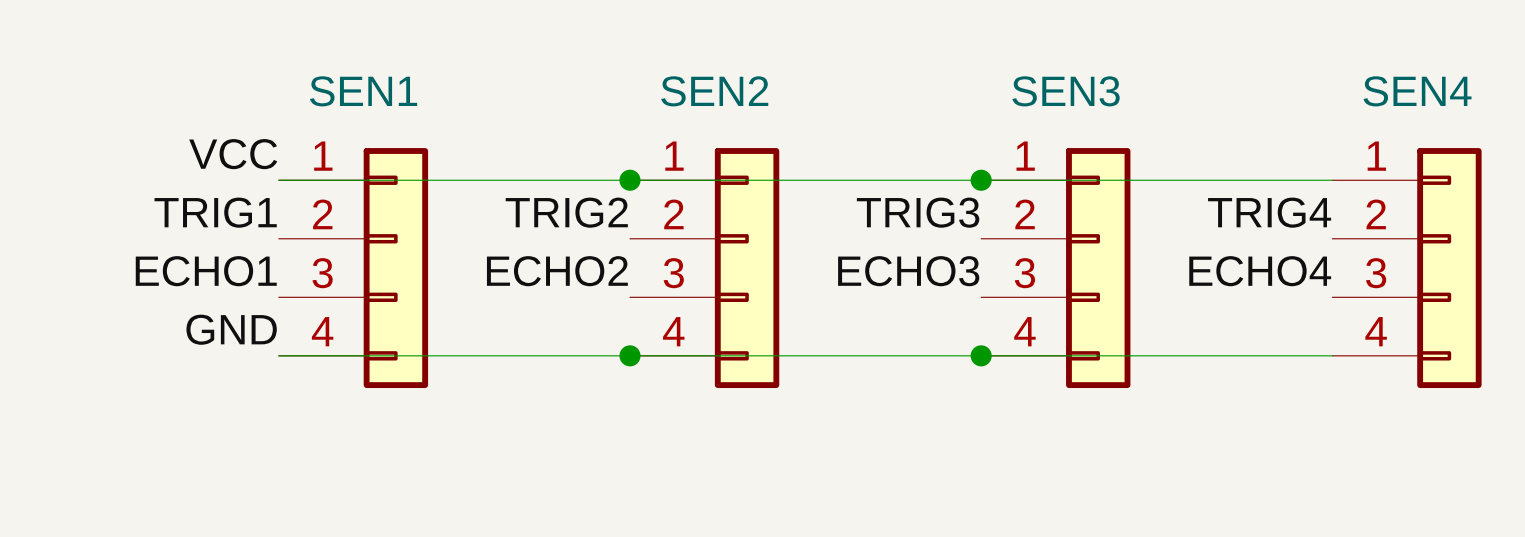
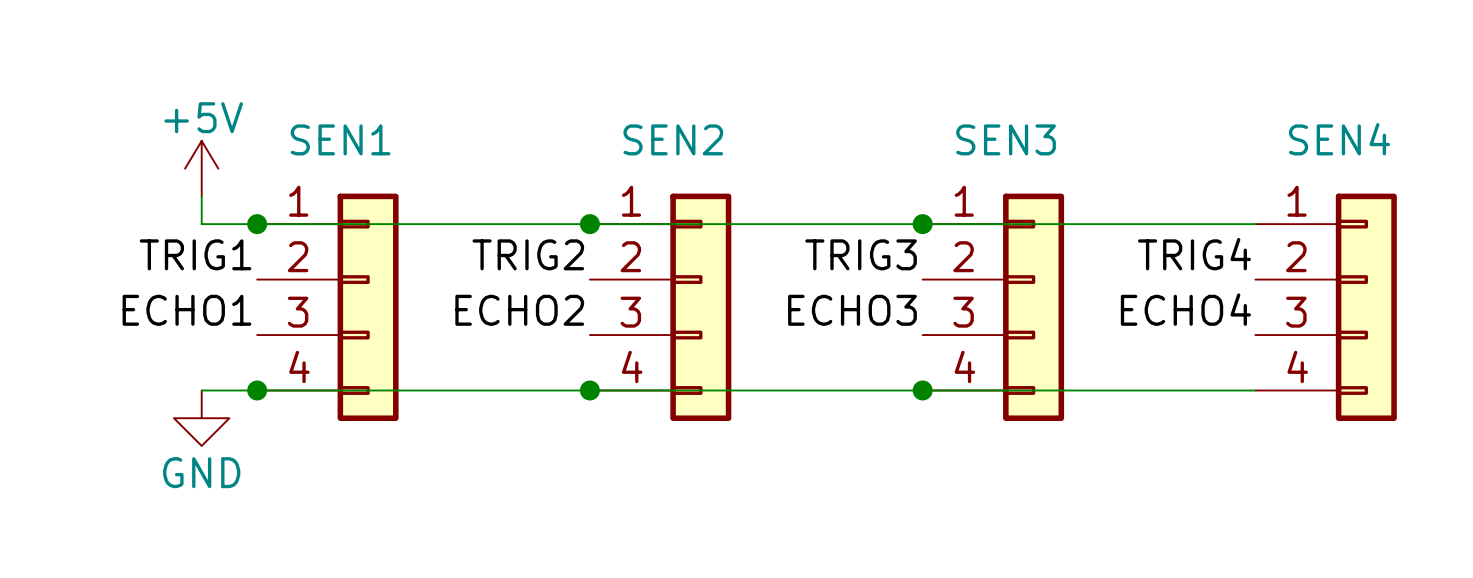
power symbol: none -> +5V (201, 168)
wire: none -> (201, 196) (201, 224) (257, 224)
label: VCC (233, 154) -> none
junction: none -> (257, 224)
label: GND (231, 329) -> none
wire: none -> (201, 390) (257, 390)
junction: none -> (257, 390)
power symbol: none -> GND (201, 418)

